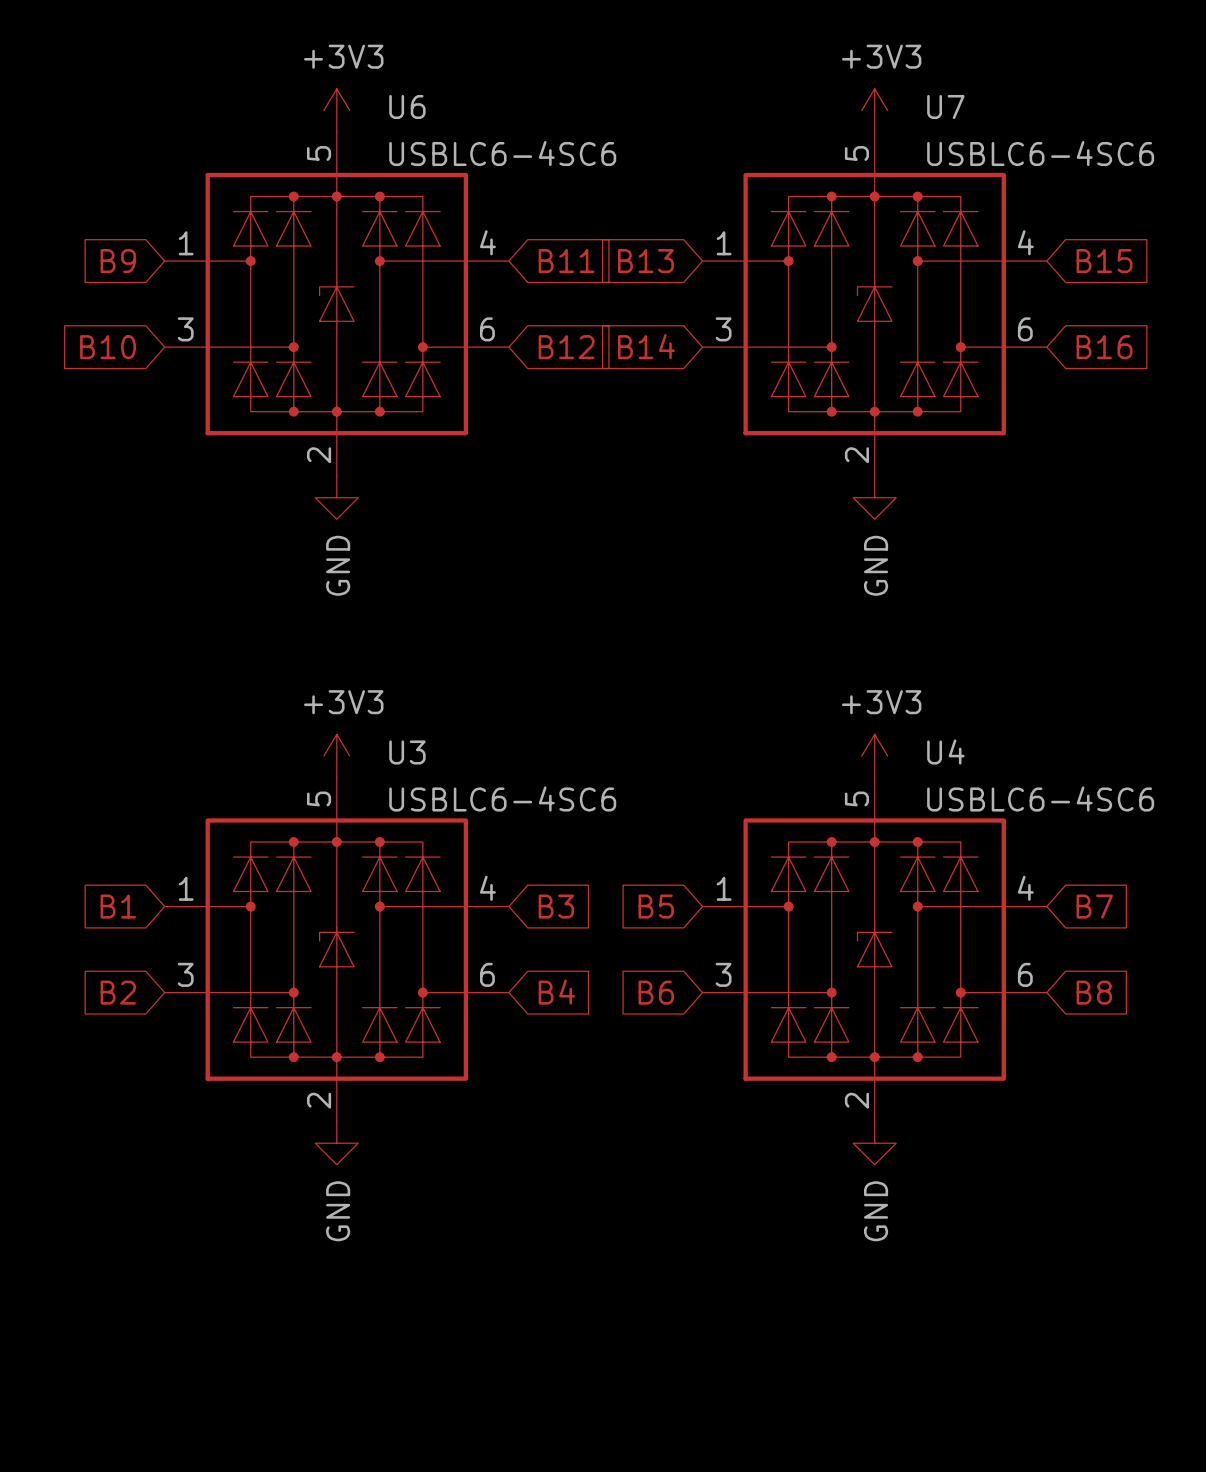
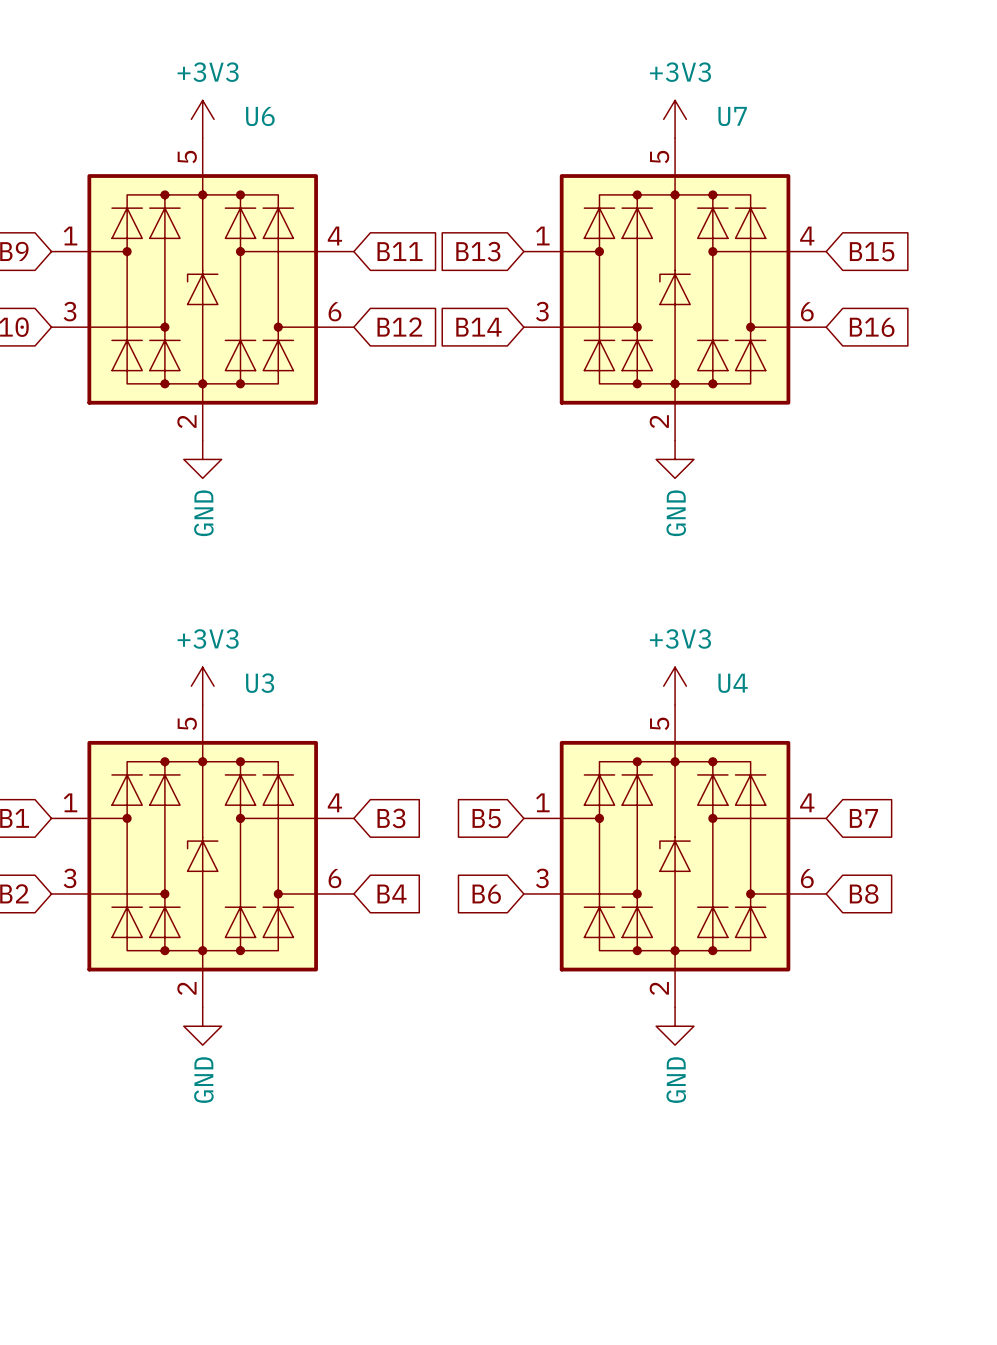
U6 value: USBLC6-4SC6 (502, 153) -> none
U7 value: USBLC6-4SC6 (1040, 153) -> none
U3 value: USBLC6-4SC6 (502, 798) -> none
U4 value: USBLC6-4SC6 (1040, 798) -> none

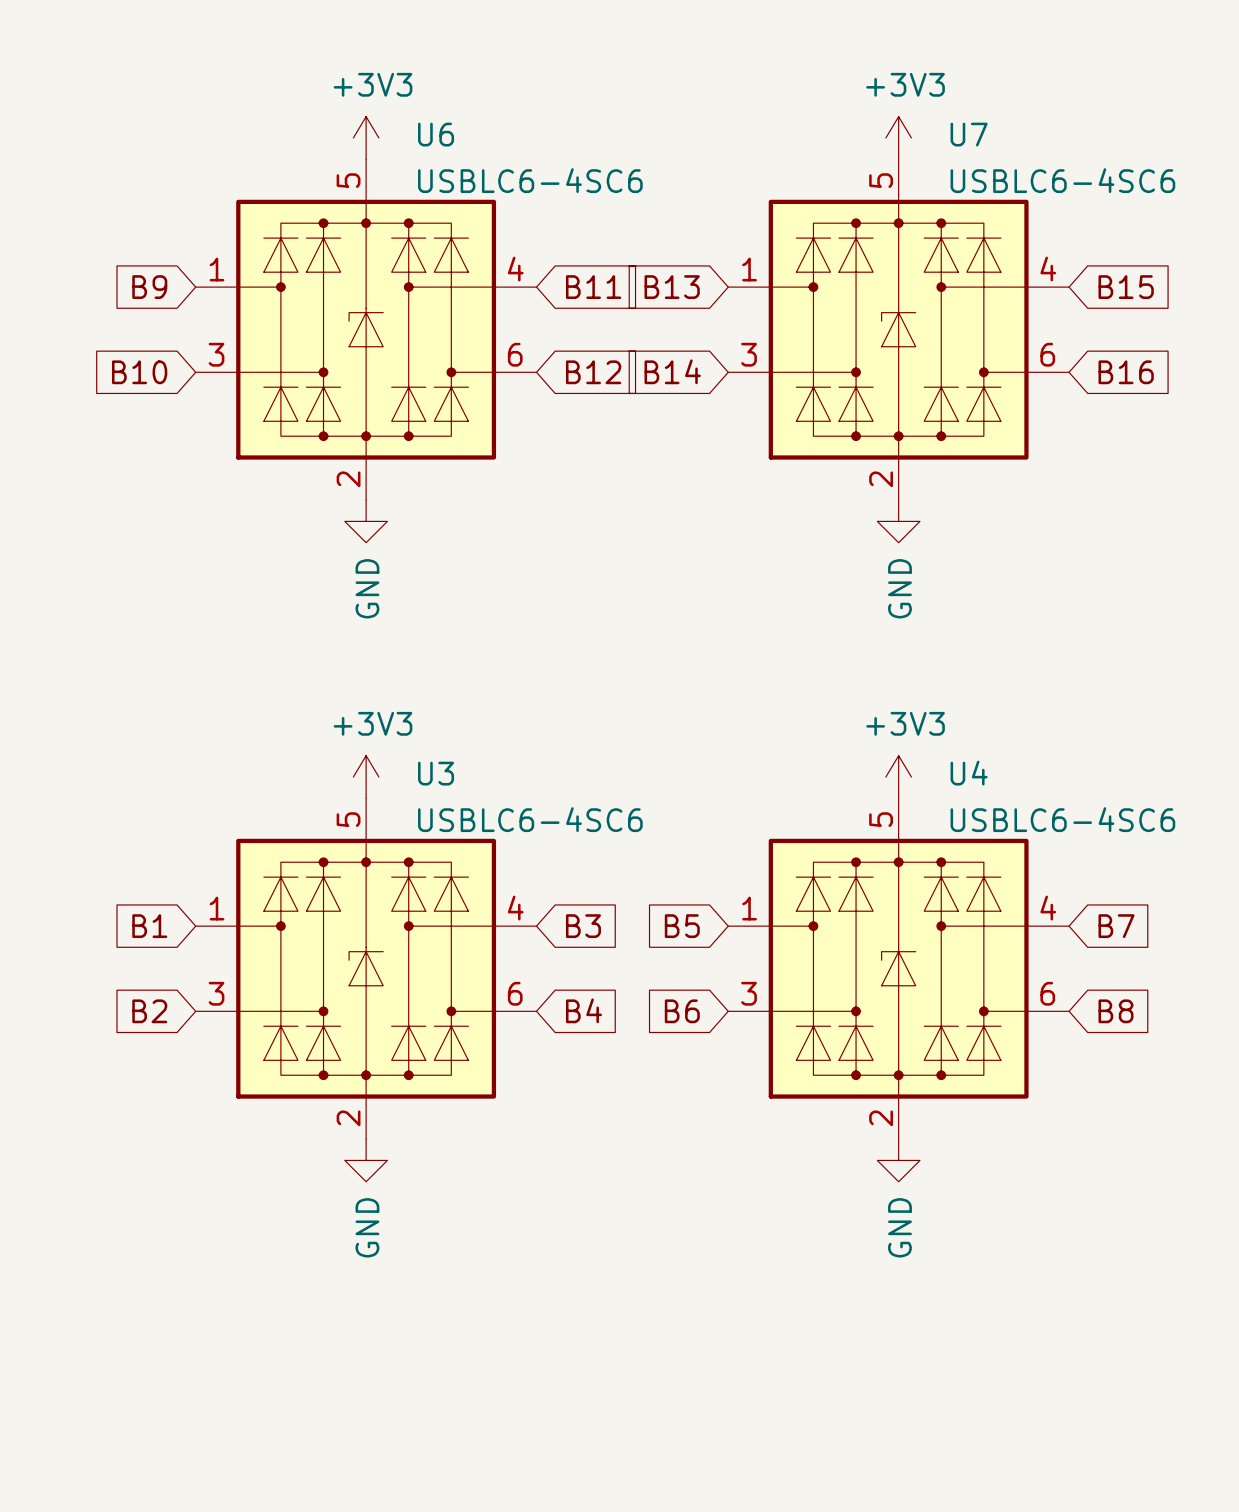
U6 value: none -> USBLC6-4SC6 (530, 180)
U7 value: none -> USBLC6-4SC6 (1062, 180)
U3 value: none -> USBLC6-4SC6 (530, 819)
U4 value: none -> USBLC6-4SC6 (1062, 819)

